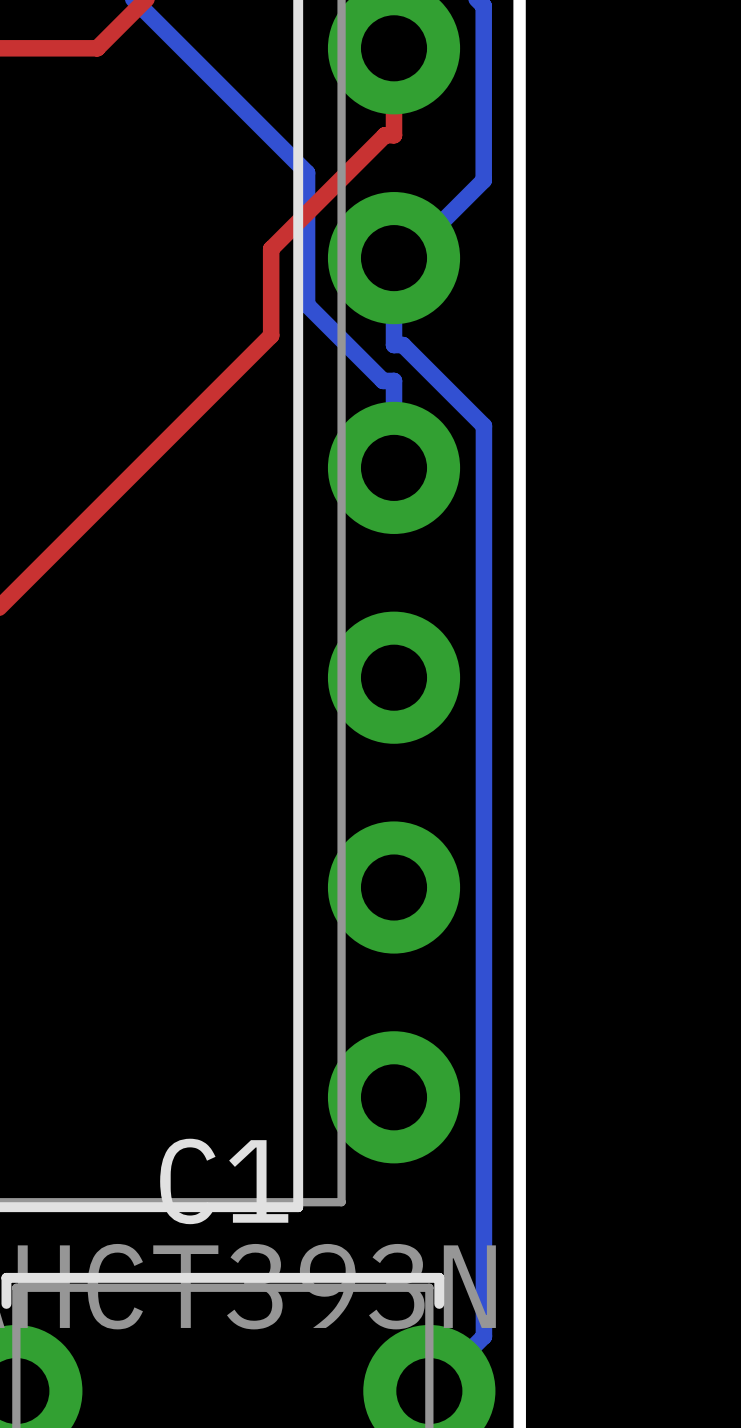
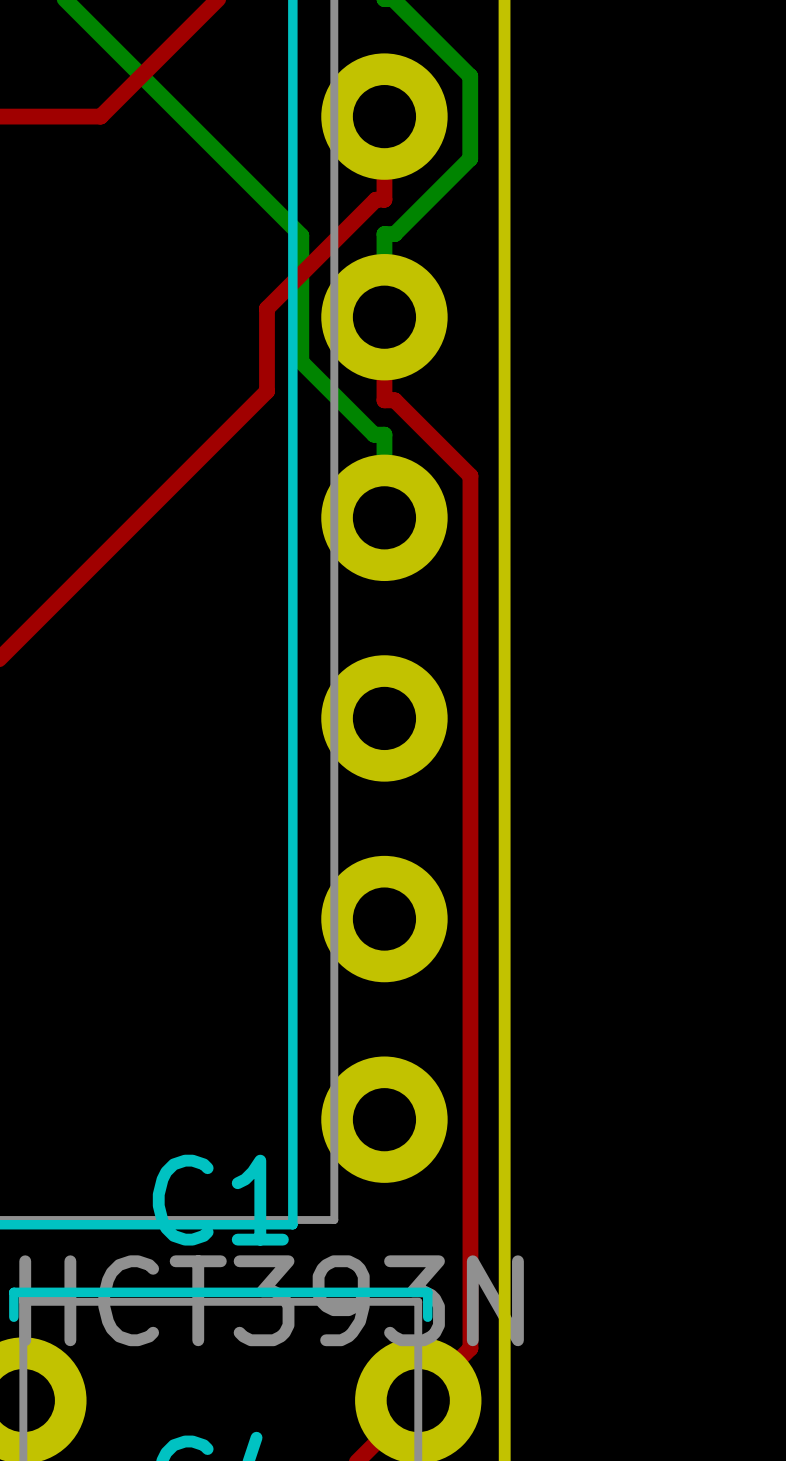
bottom track: (483, 92) (483, 180) (394, 270) -> (470, 158) (394, 234) (384, 234) (384, 317)
bottom track: (394, 258) (394, 345) (403, 345) (483, 425) (483, 1336) (429, 1391) -> none
top track: none -> (384, 317) (384, 400) (394, 400) (470, 475) (470, 1348) (418, 1400)

